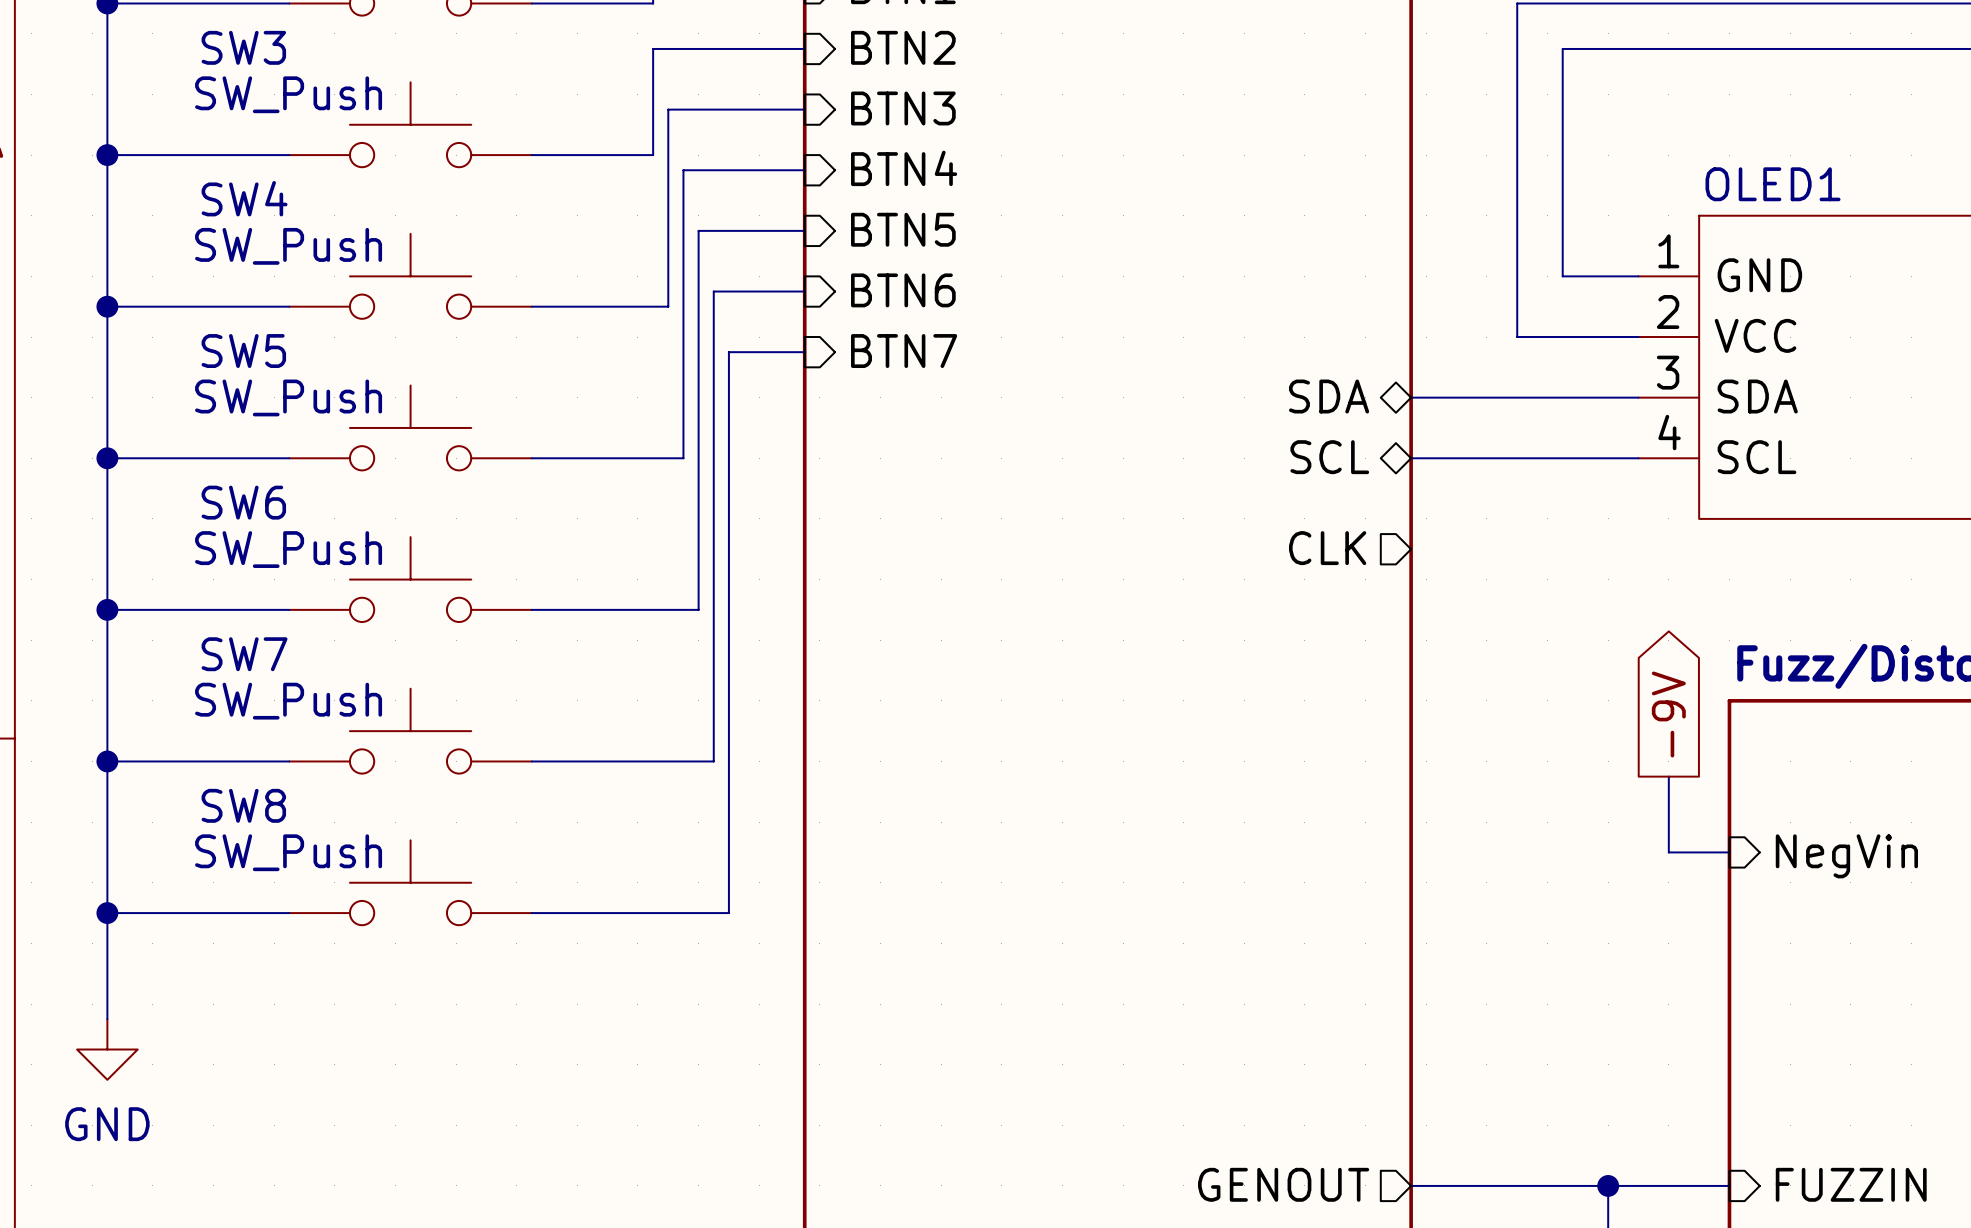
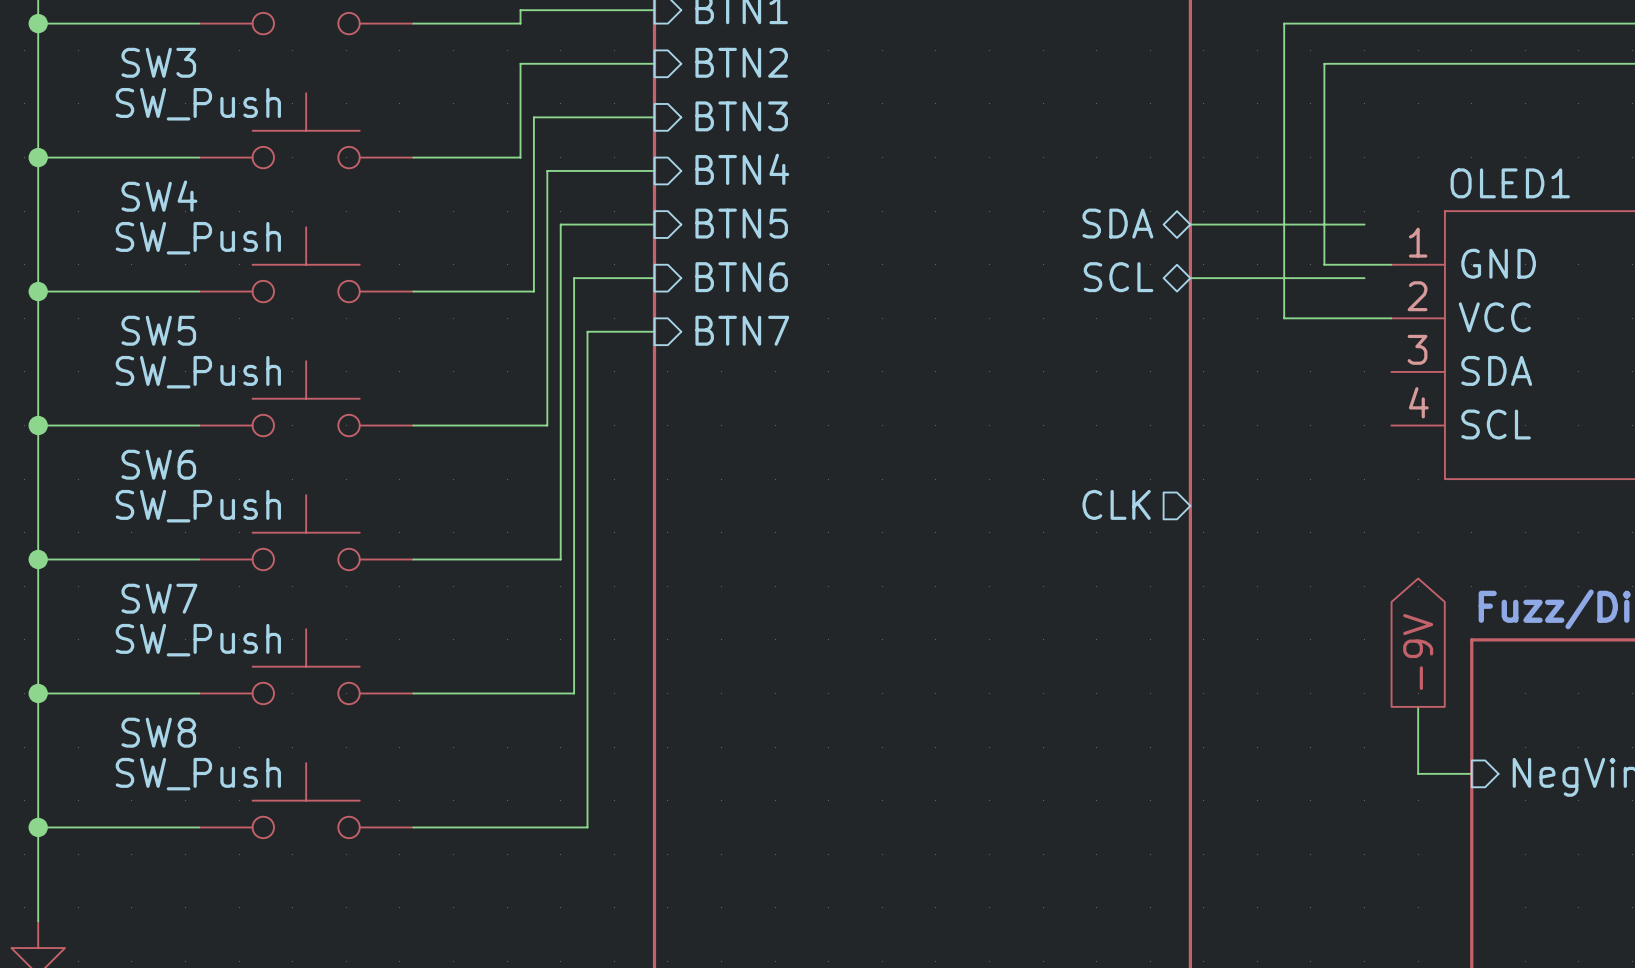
wire: none -> (1190, 224) (1364, 224)
wire: none -> (1190, 278) (1364, 278)
sheet pin position: SDA (1329, 396) -> SDA (1117, 223)
wire: (1411, 397) (1638, 397) -> none
sheet pin position: SCL (1329, 457) -> SCL (1118, 277)
wire: (1411, 458) (1638, 458) -> none

